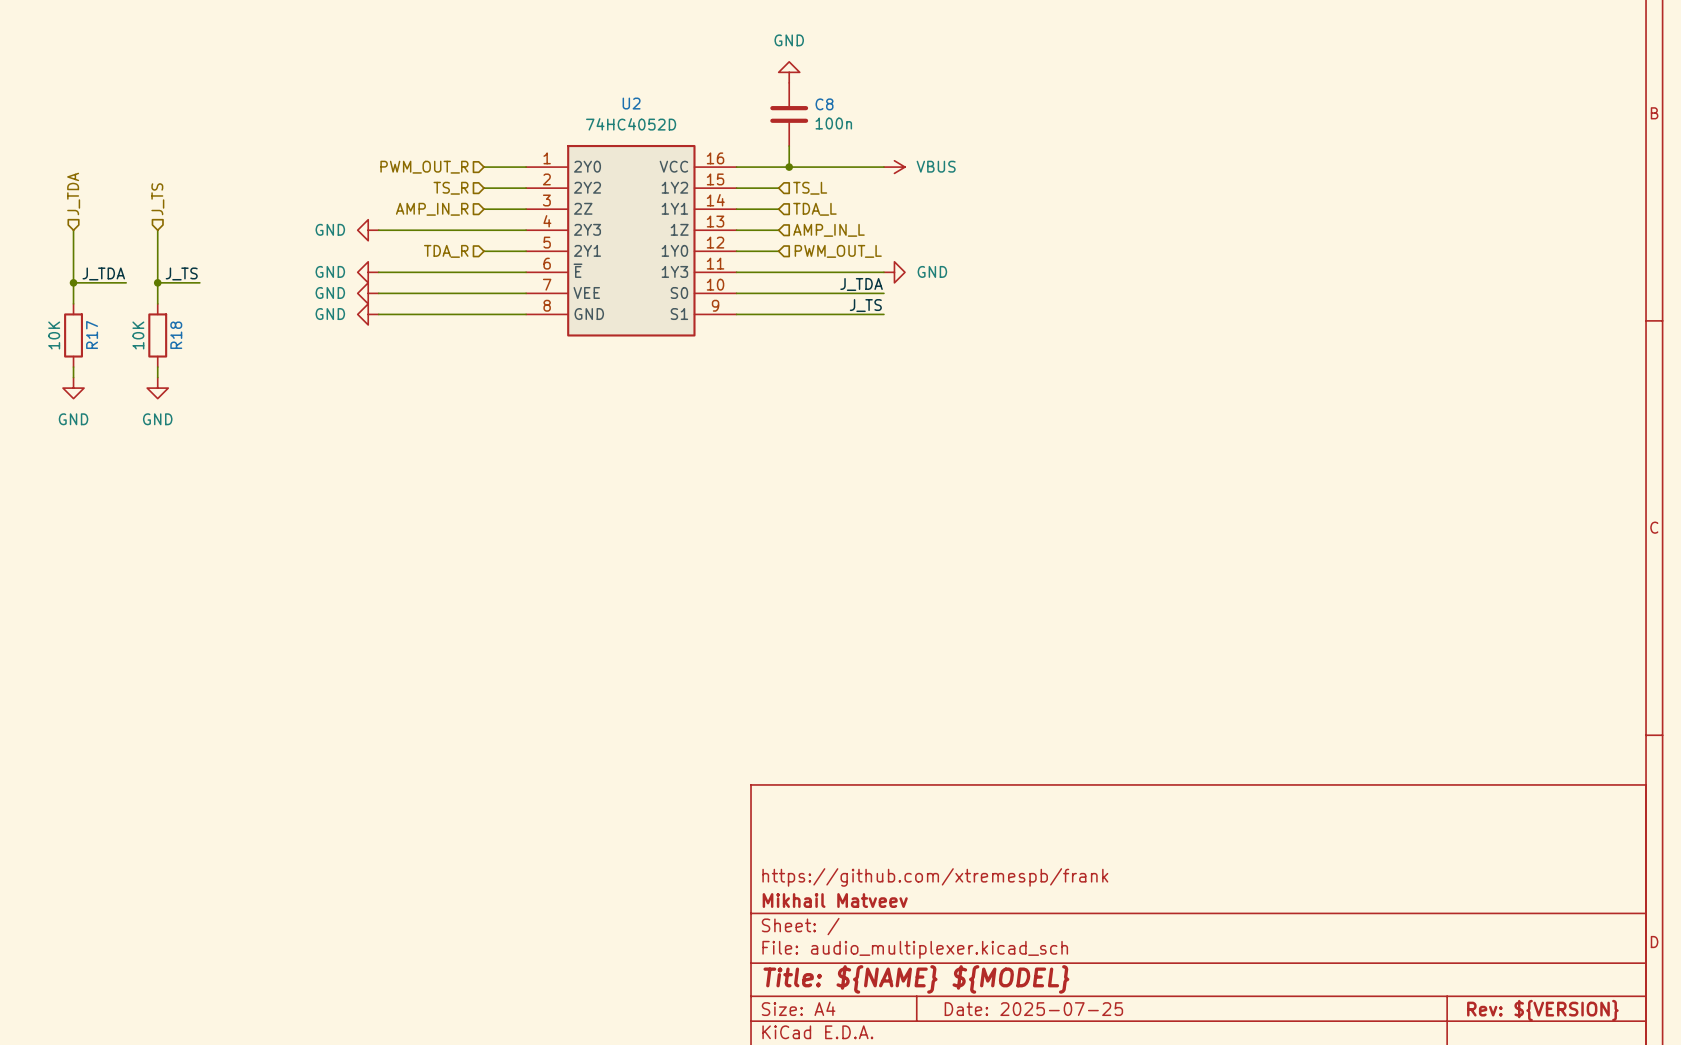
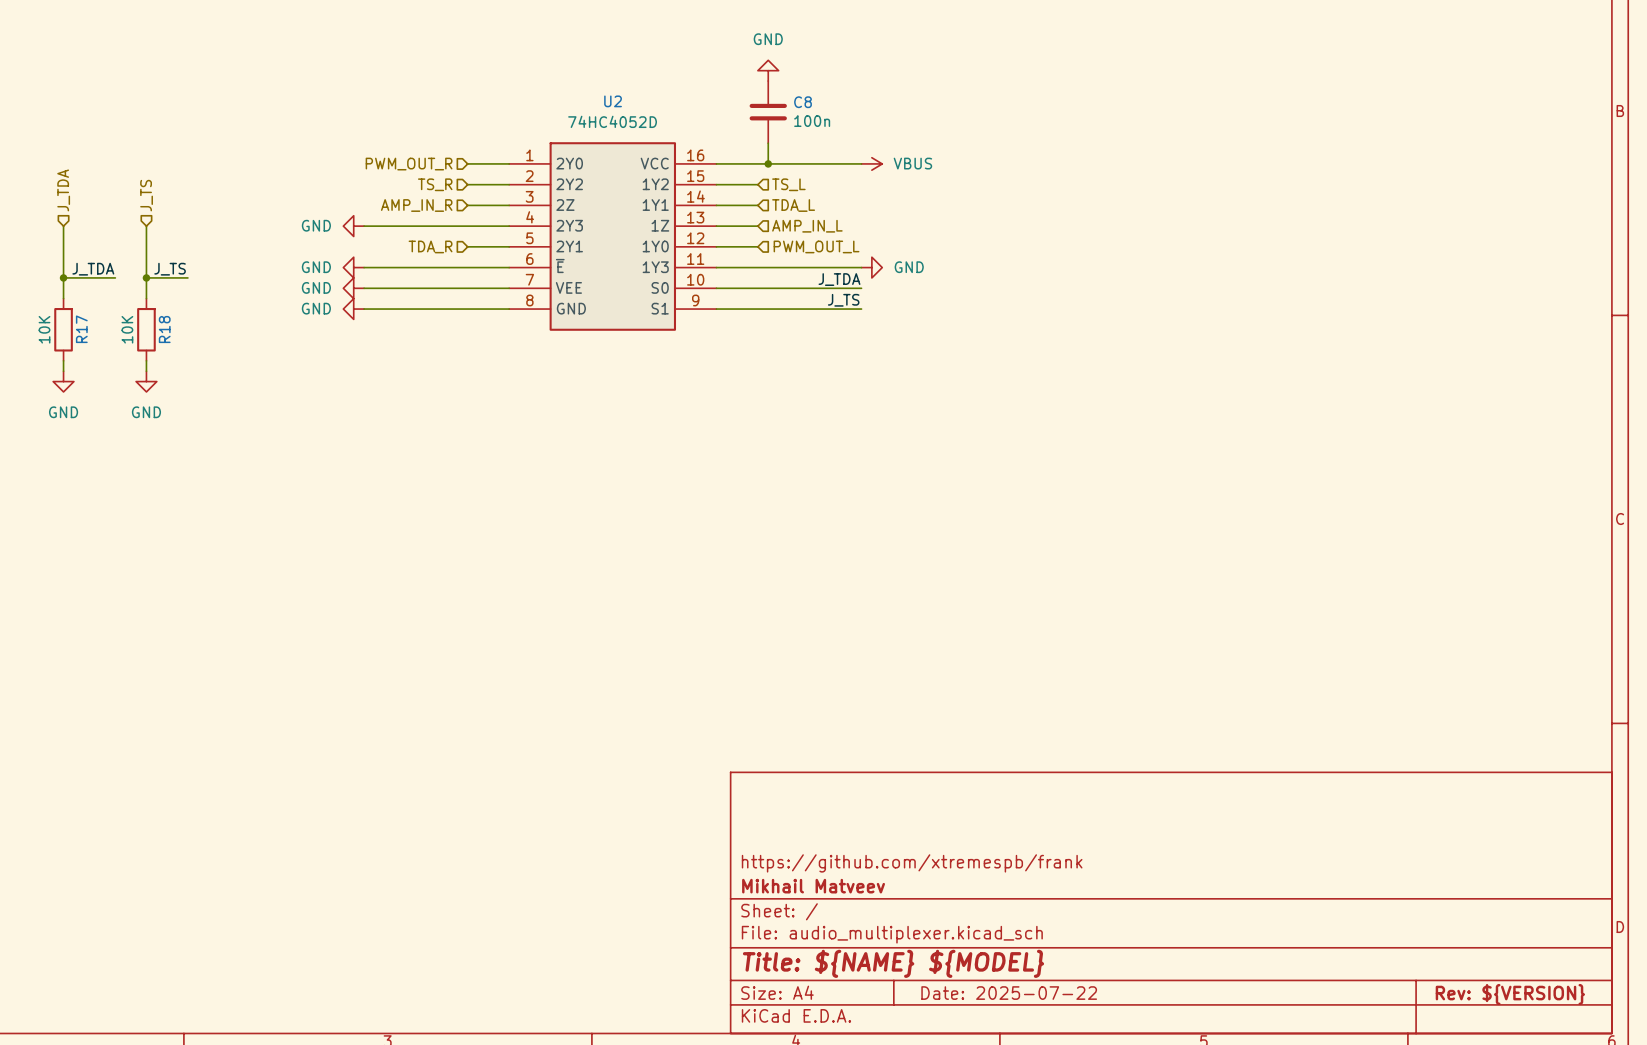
title block: Date: 2025-07-25 (1033, 1009) -> Date: 2025-07-22 (1009, 993)

